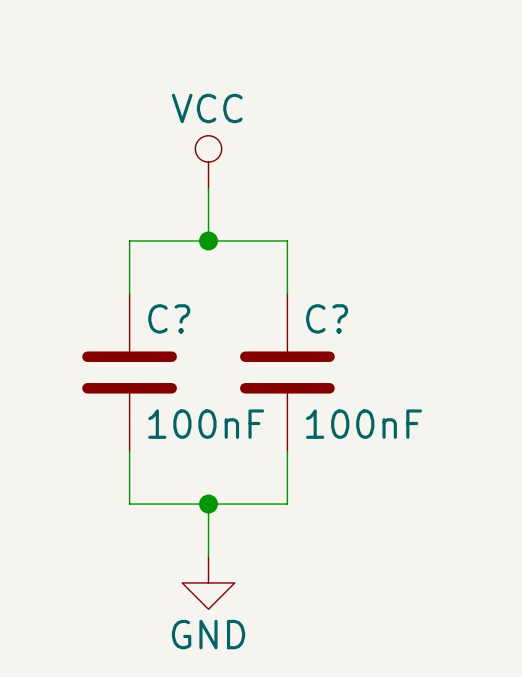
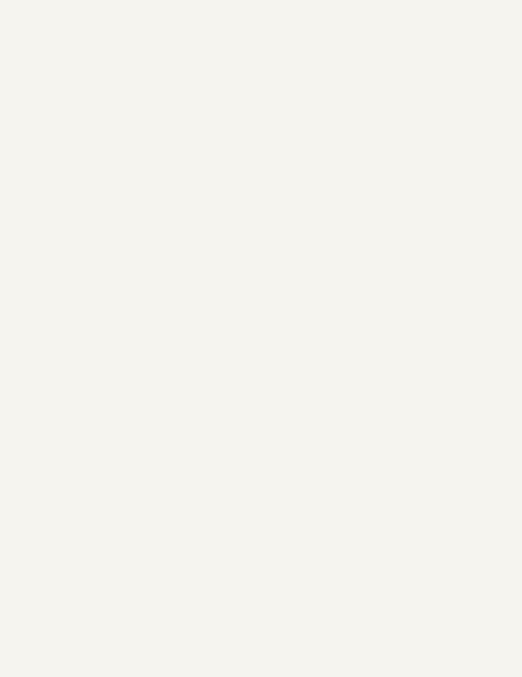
power symbol: VCC (208, 162) -> none
wire: (208, 188) (208, 240) -> none
junction: (208, 240) -> none
wire: (129, 293) (129, 240) (287, 240) (287, 293) -> none
C?: 100nF (129, 372) -> none
C?: 100nF (287, 372) -> none
wire: (129, 451) (129, 504) (287, 504) (287, 451) -> none
wire: (208, 504) (208, 556) -> none
junction: (208, 504) -> none
power symbol: GND (208, 582) -> none

